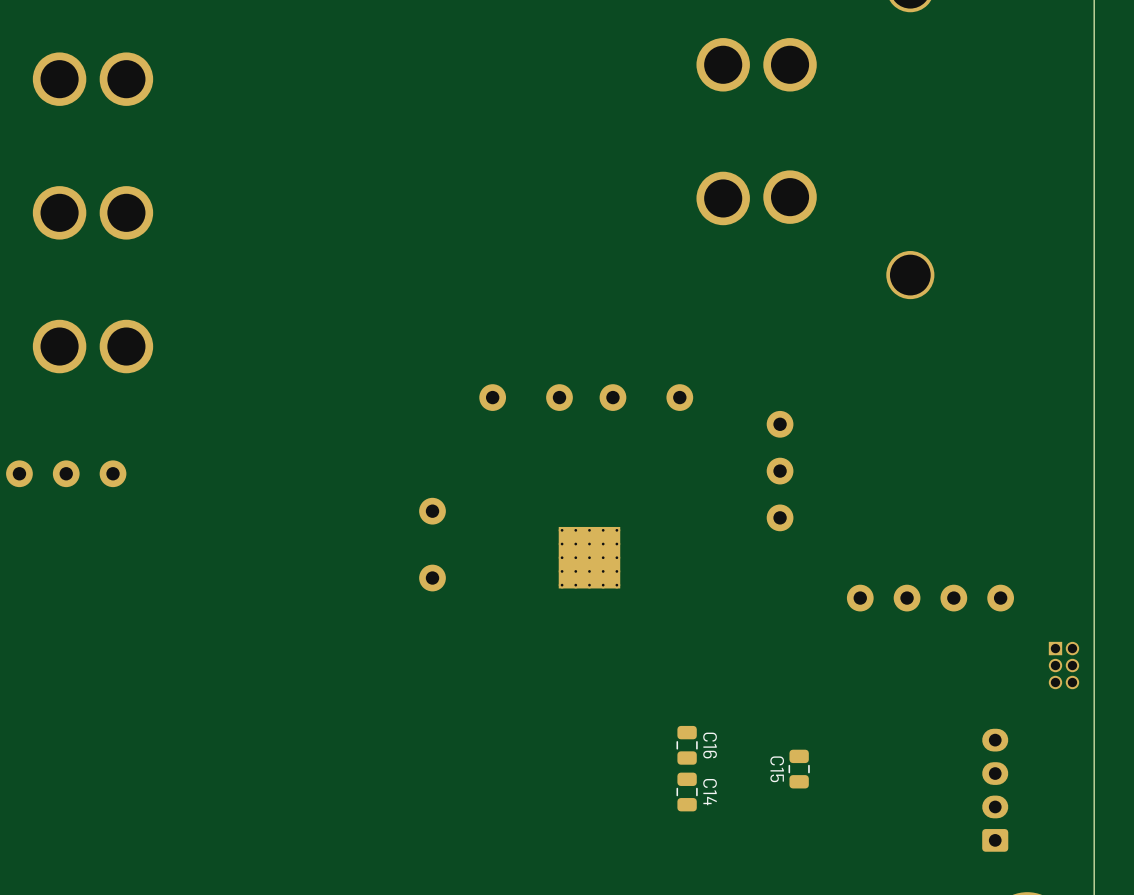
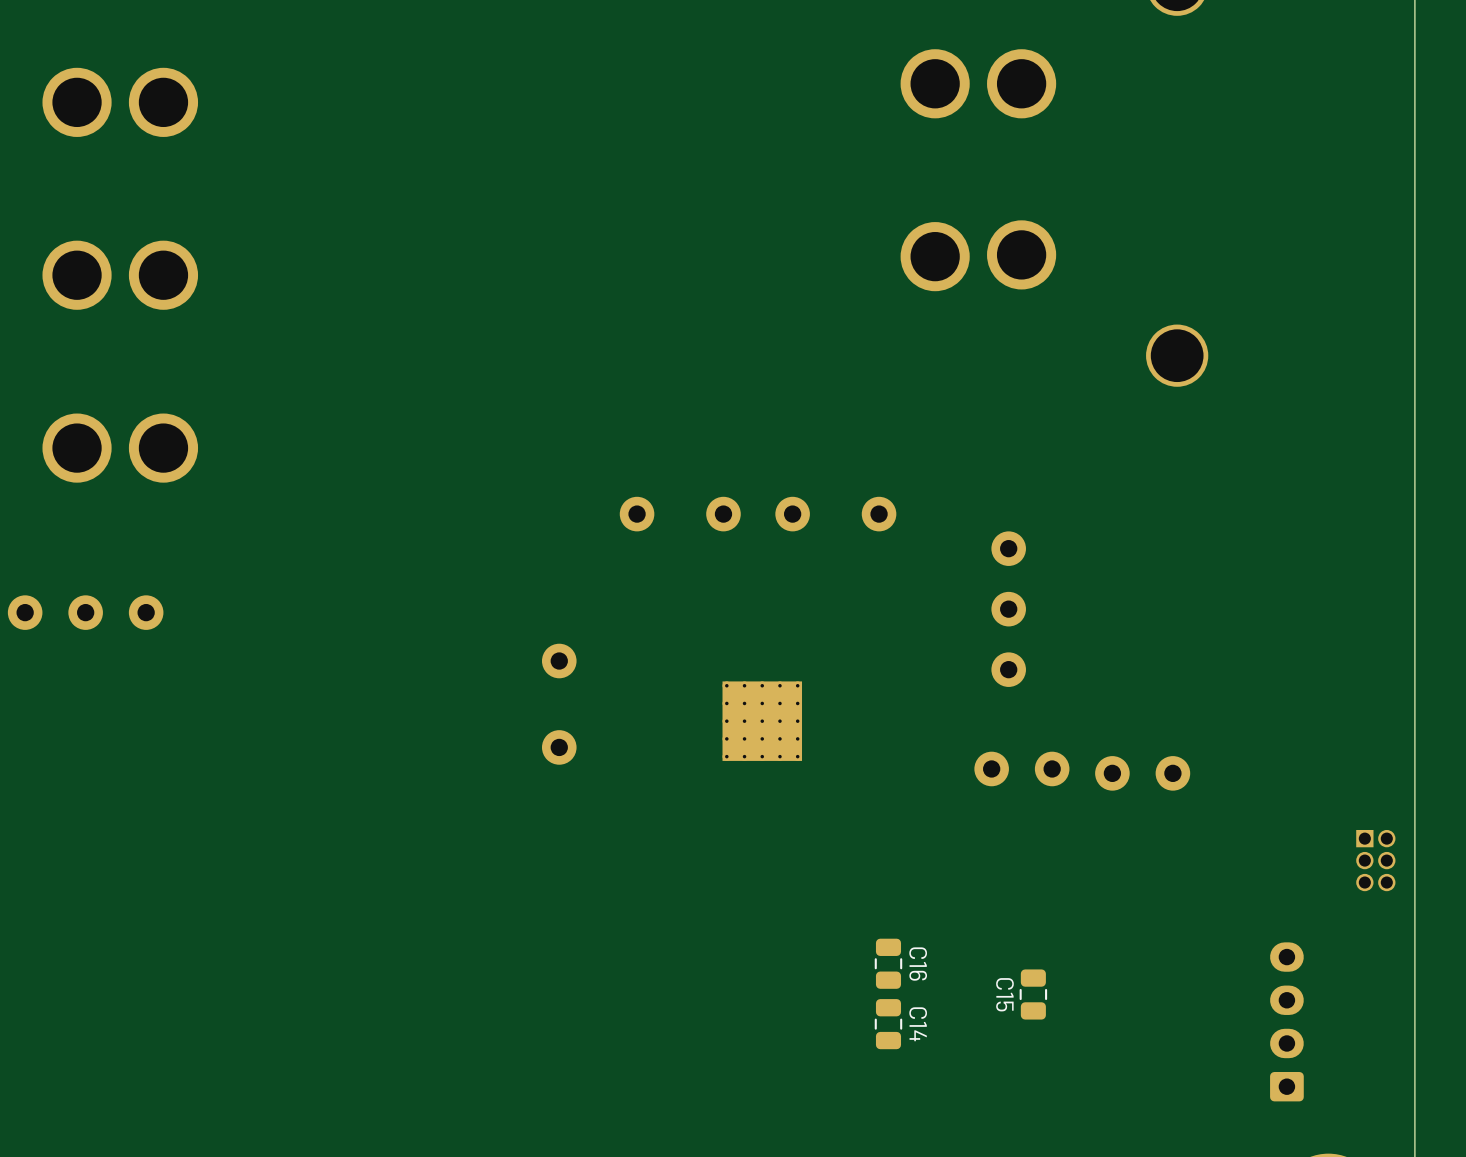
part: none -> (991, 768)
part: none -> (1052, 768)
part: (953, 598) -> none
part: (1000, 598) -> none

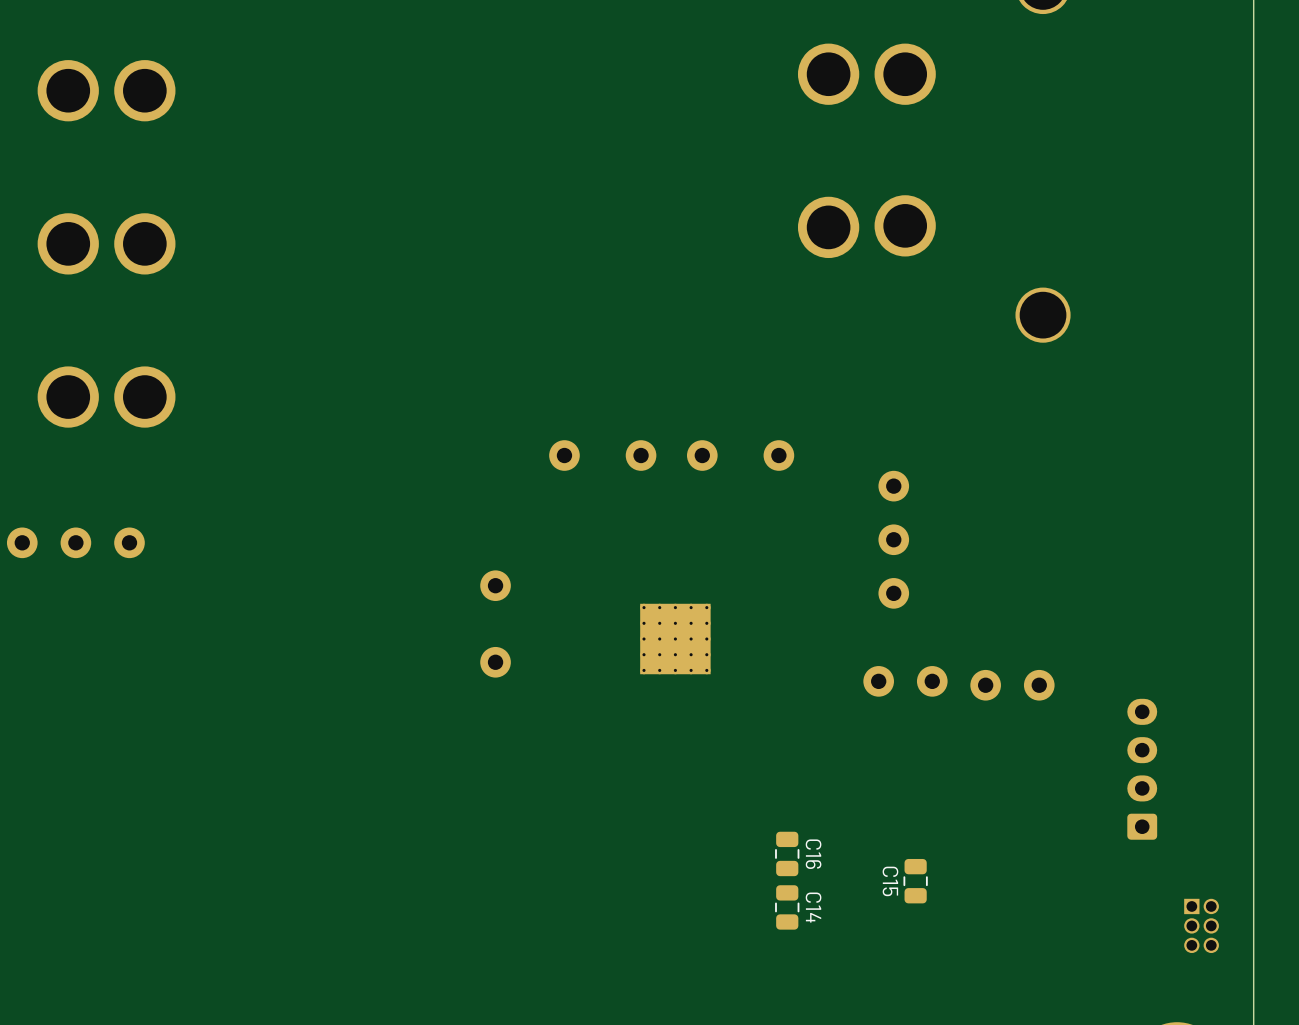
part position: (1375, 860) -> (1201, 925)
part position: (1286, 1021) -> (1142, 769)

